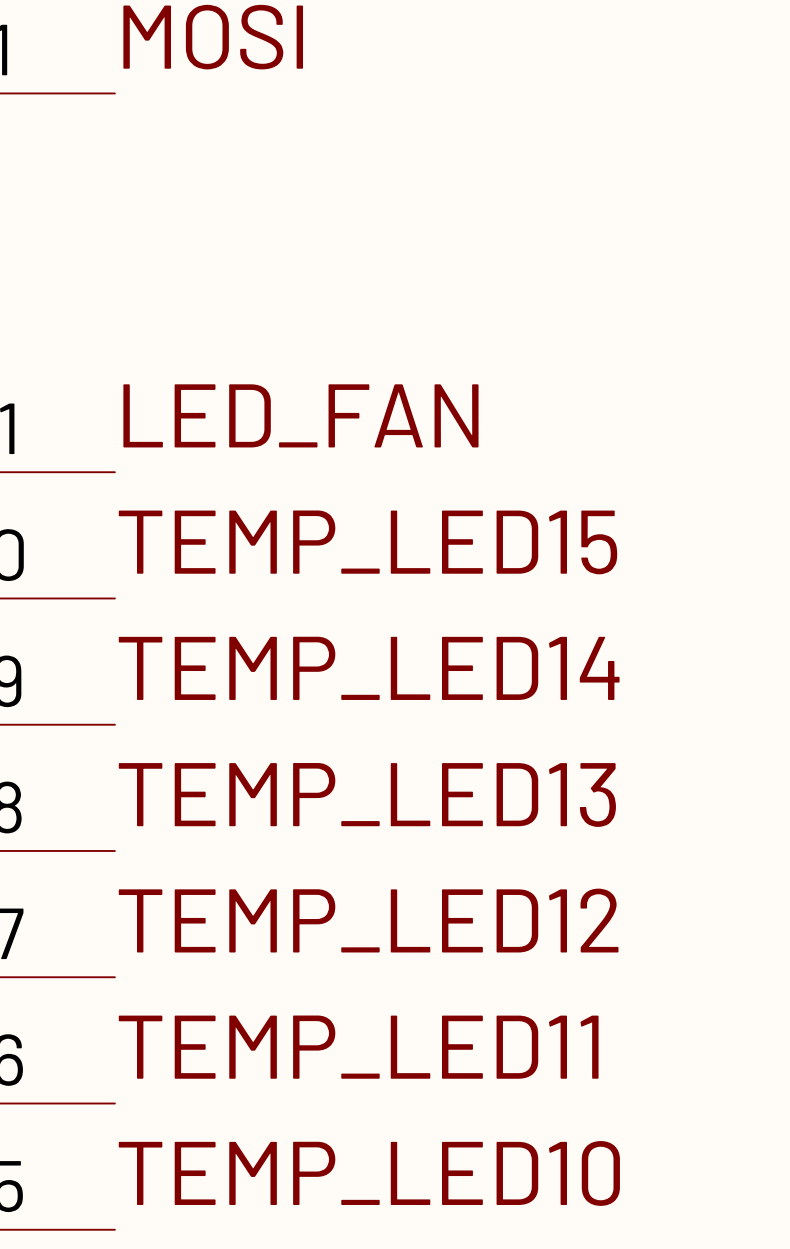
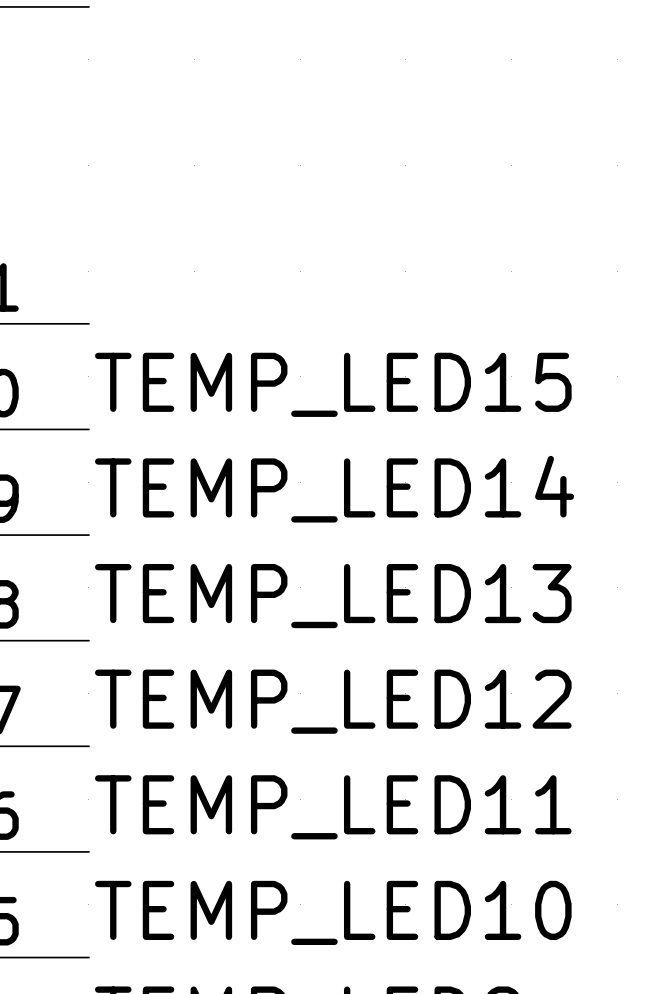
label: LED_FAN (300, 415) -> none

